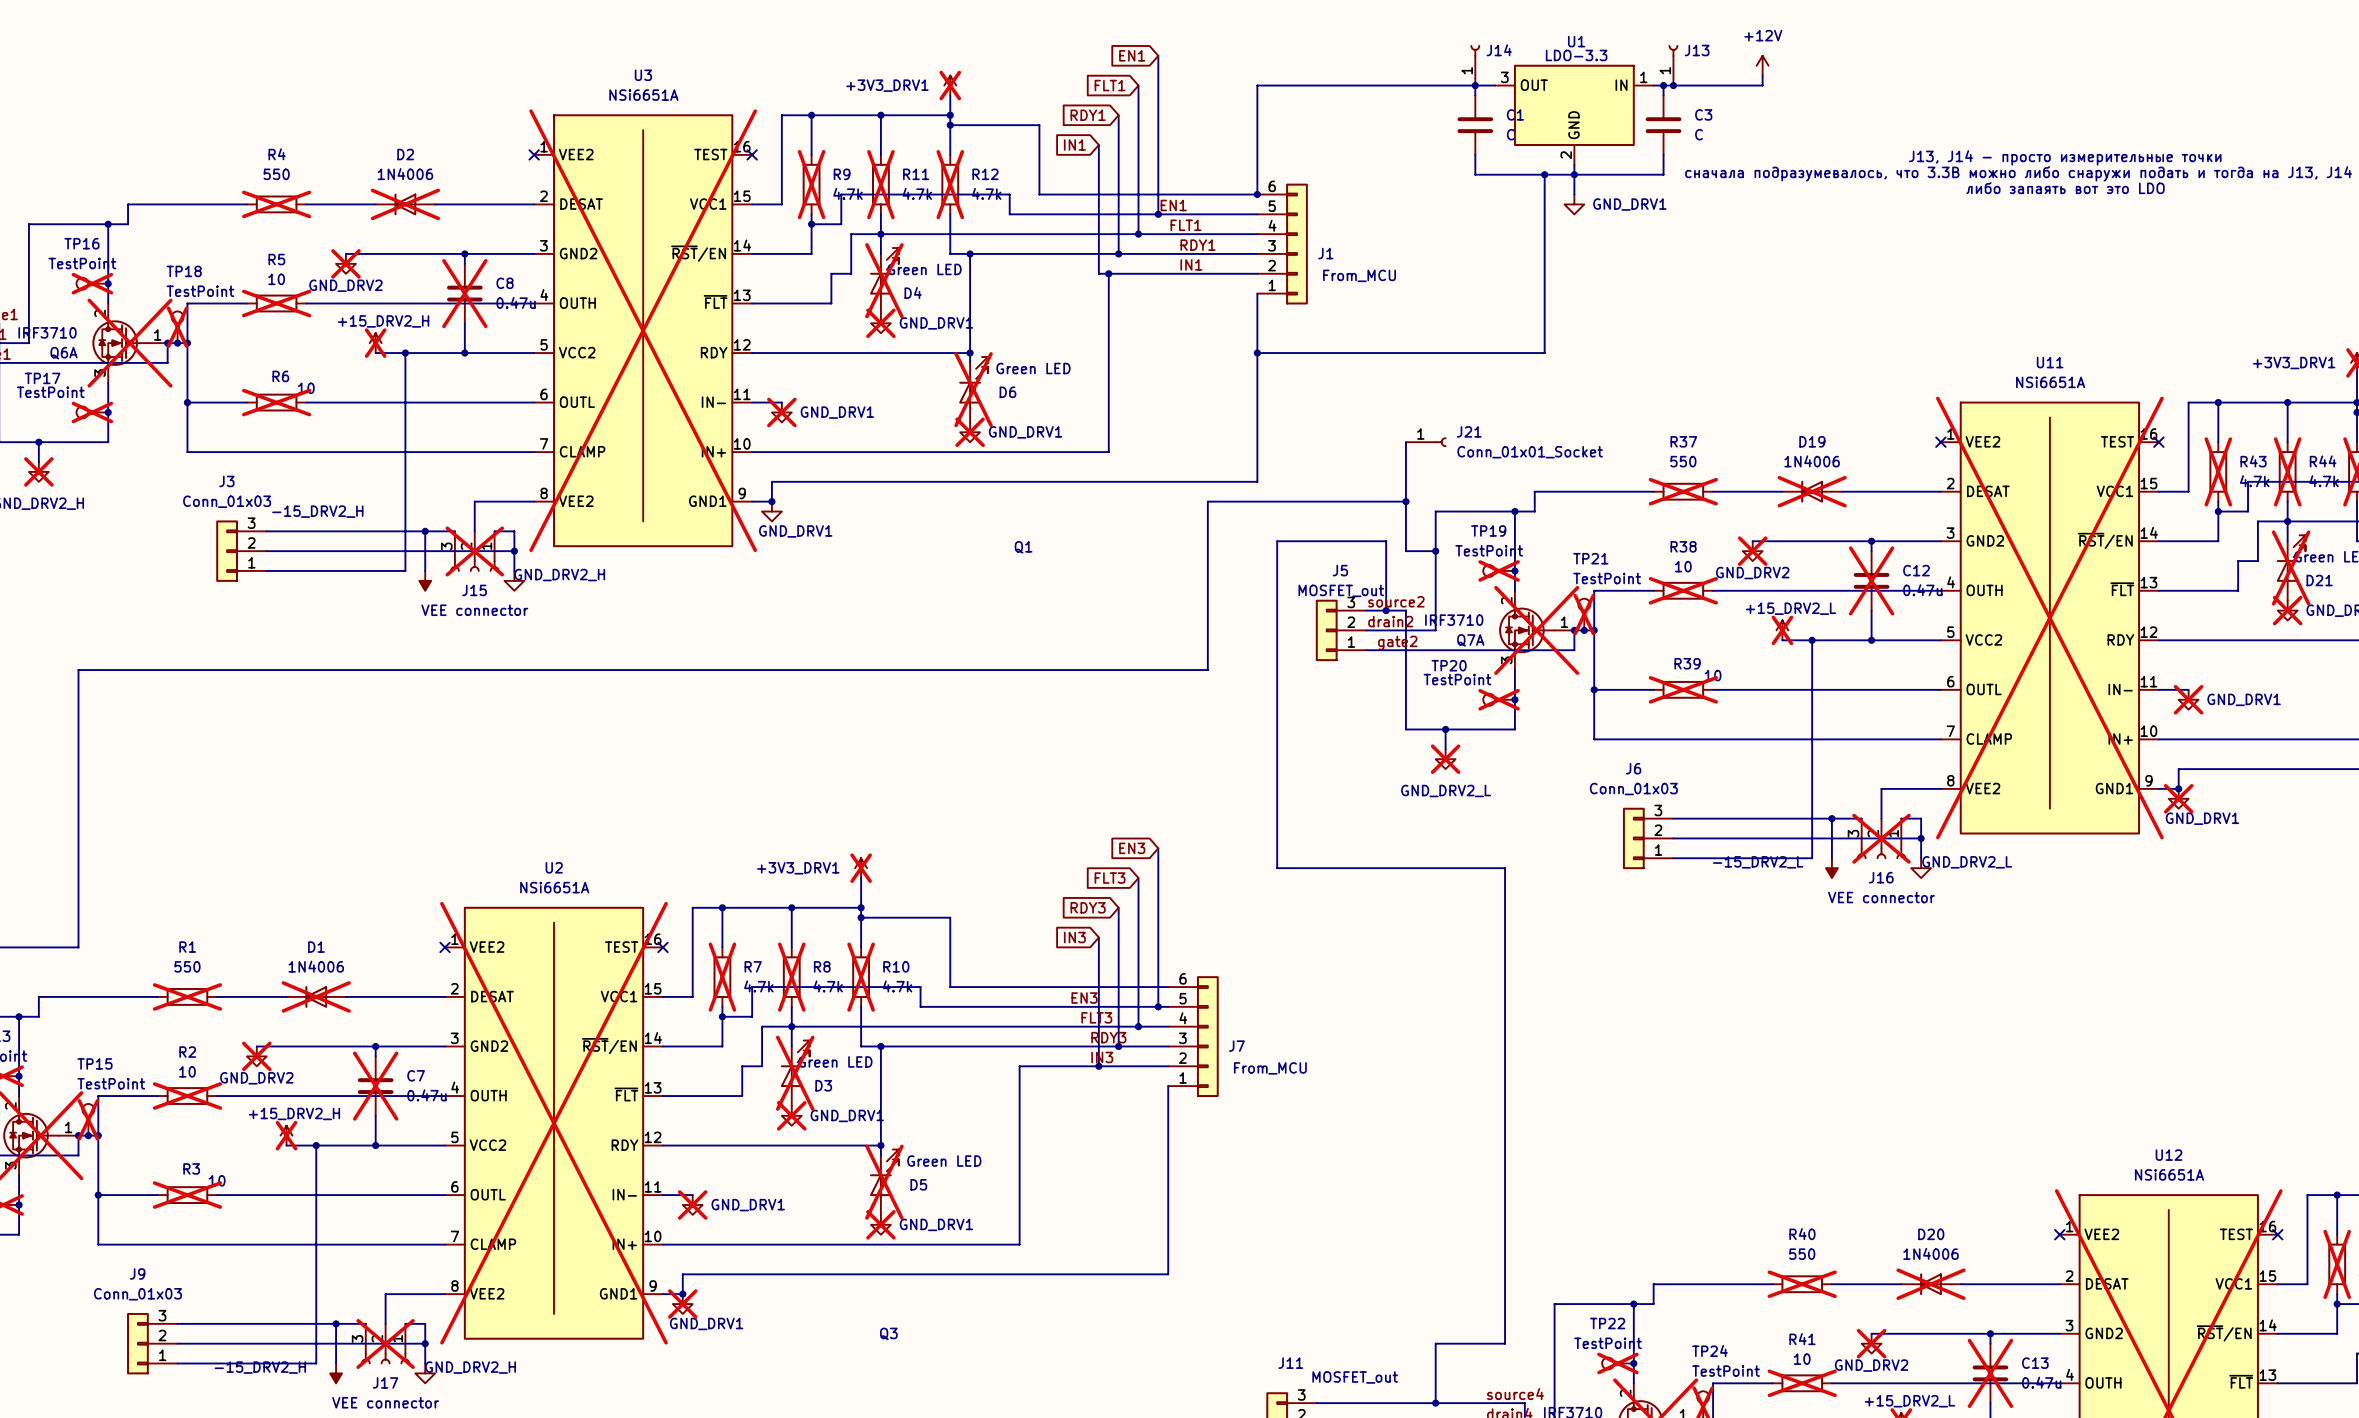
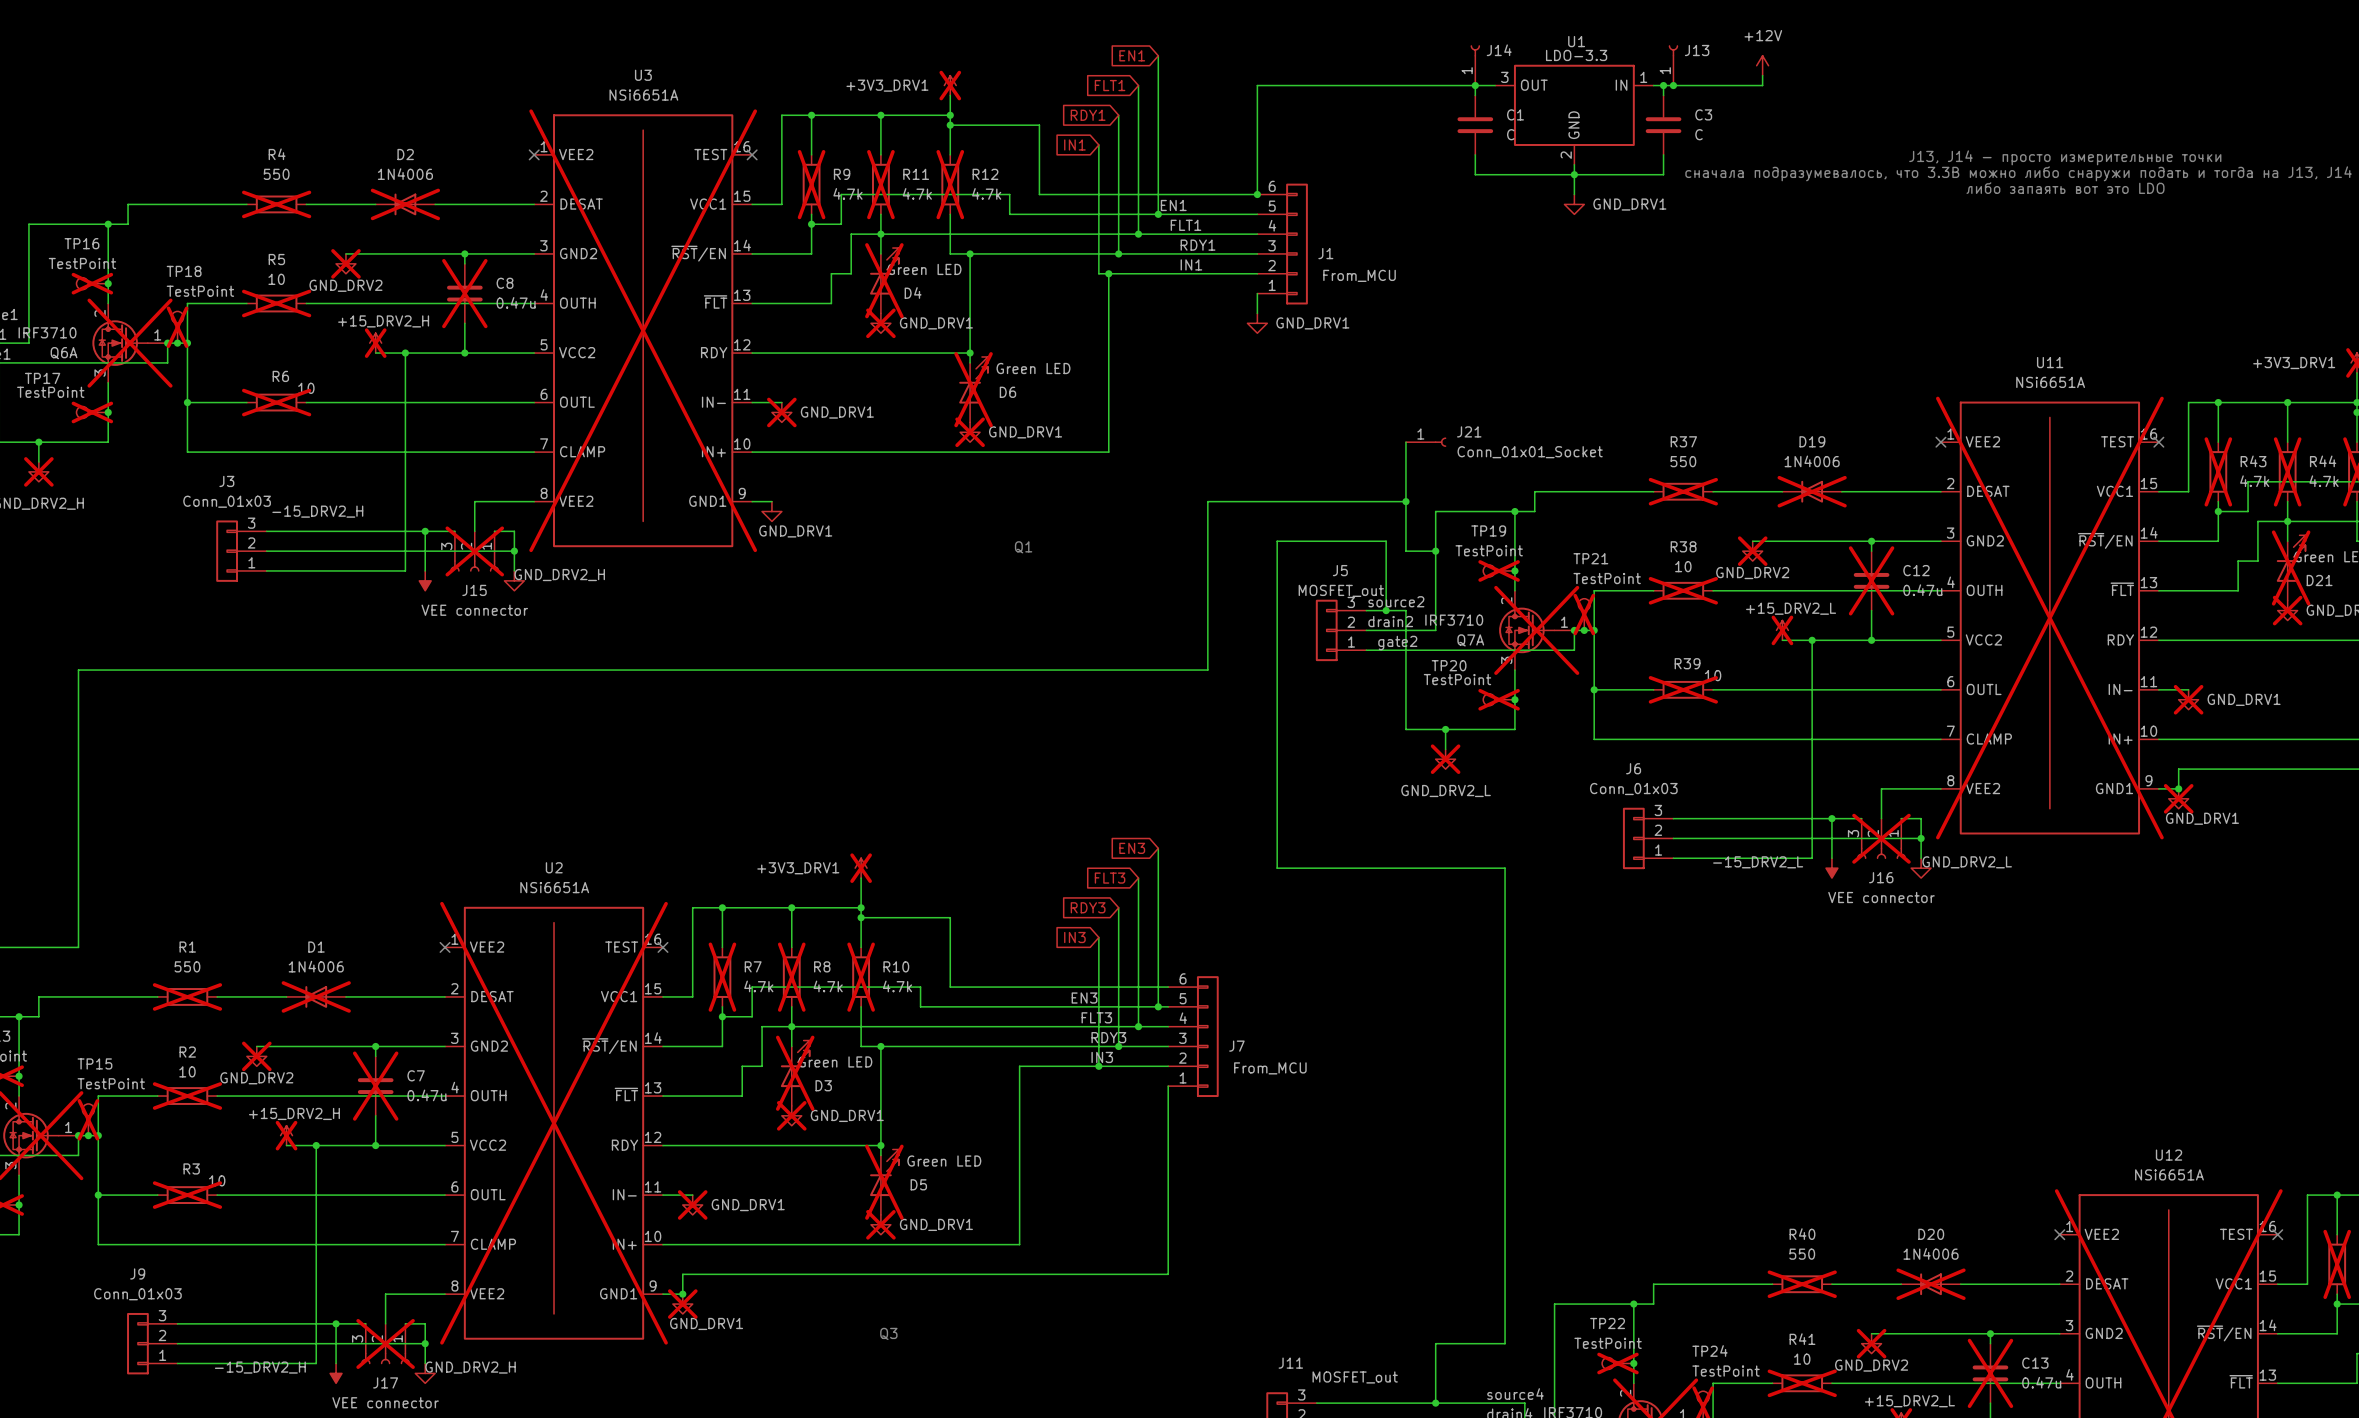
wire: (1544, 174) (1544, 353) (1257, 353) -> none
junction: (1544, 174) -> none
wire: (1257, 313) (1257, 481) (771, 481) (771, 501) -> none
power symbol: none -> GND_DRV1 (1257, 323)
junction: (1257, 353) -> none
junction: (771, 501) -> none

